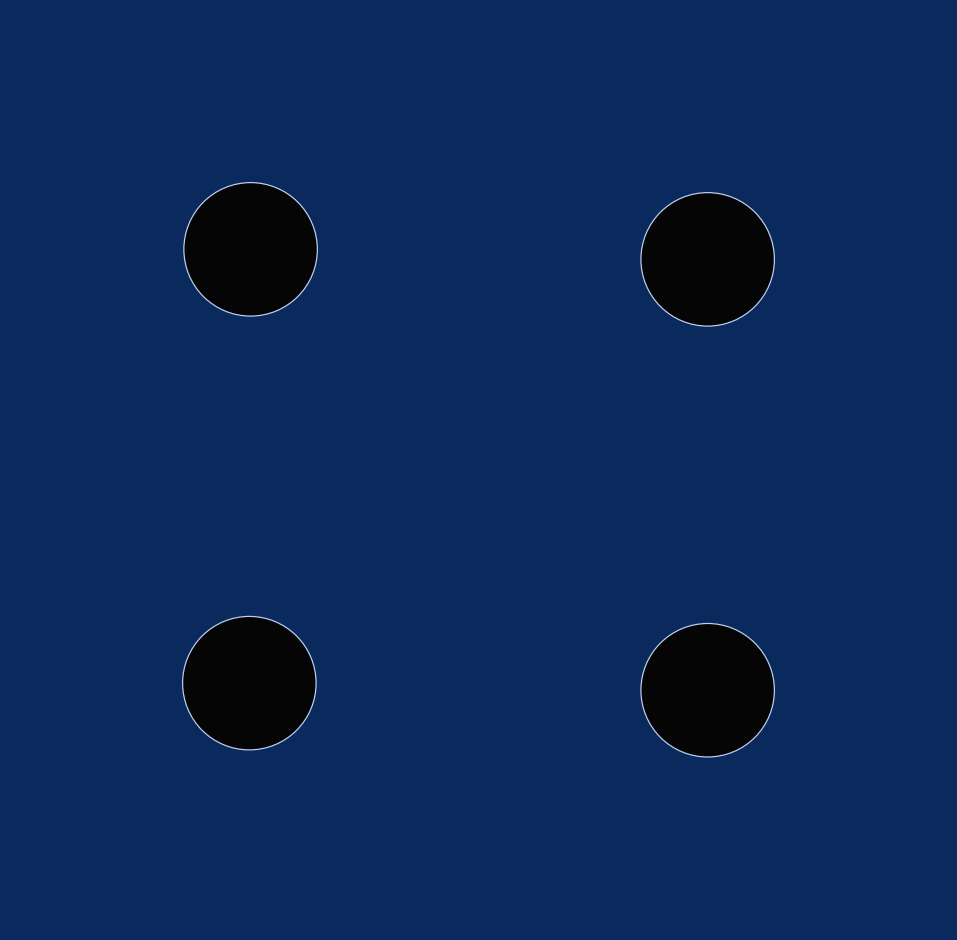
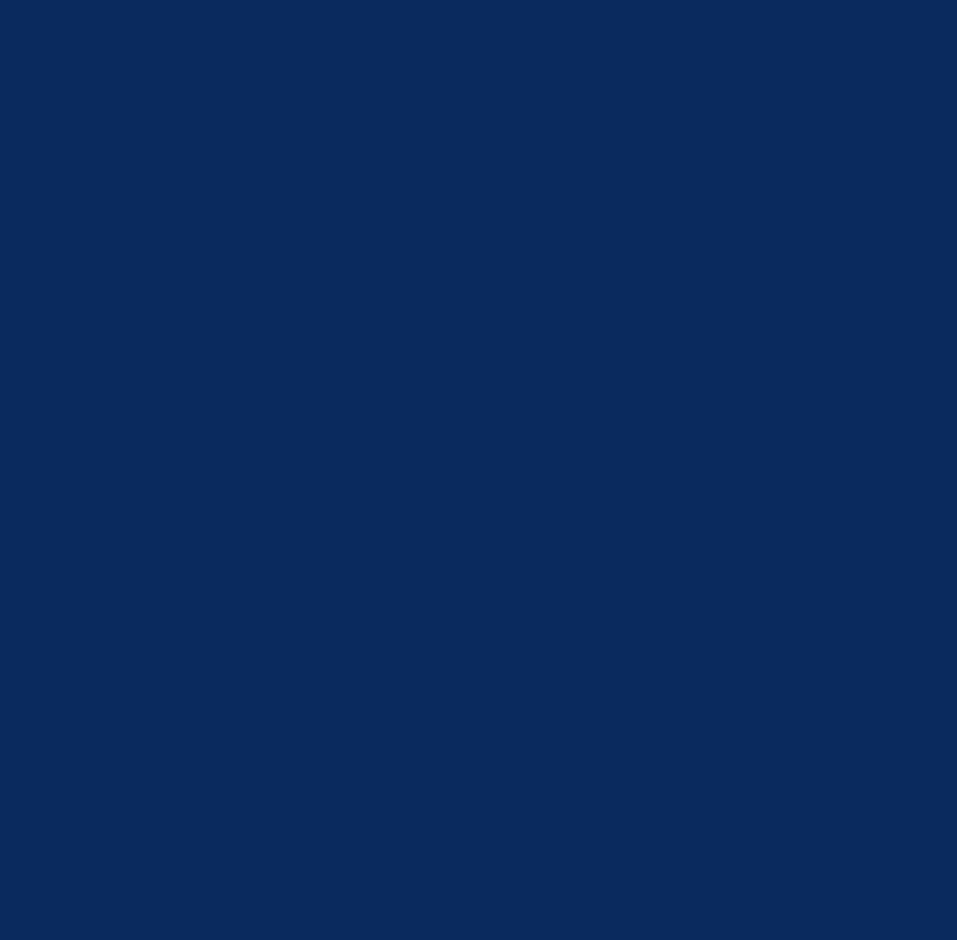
part: (250, 249) -> none
part: (707, 259) -> none
part: (249, 683) -> none
part: (707, 690) -> none

